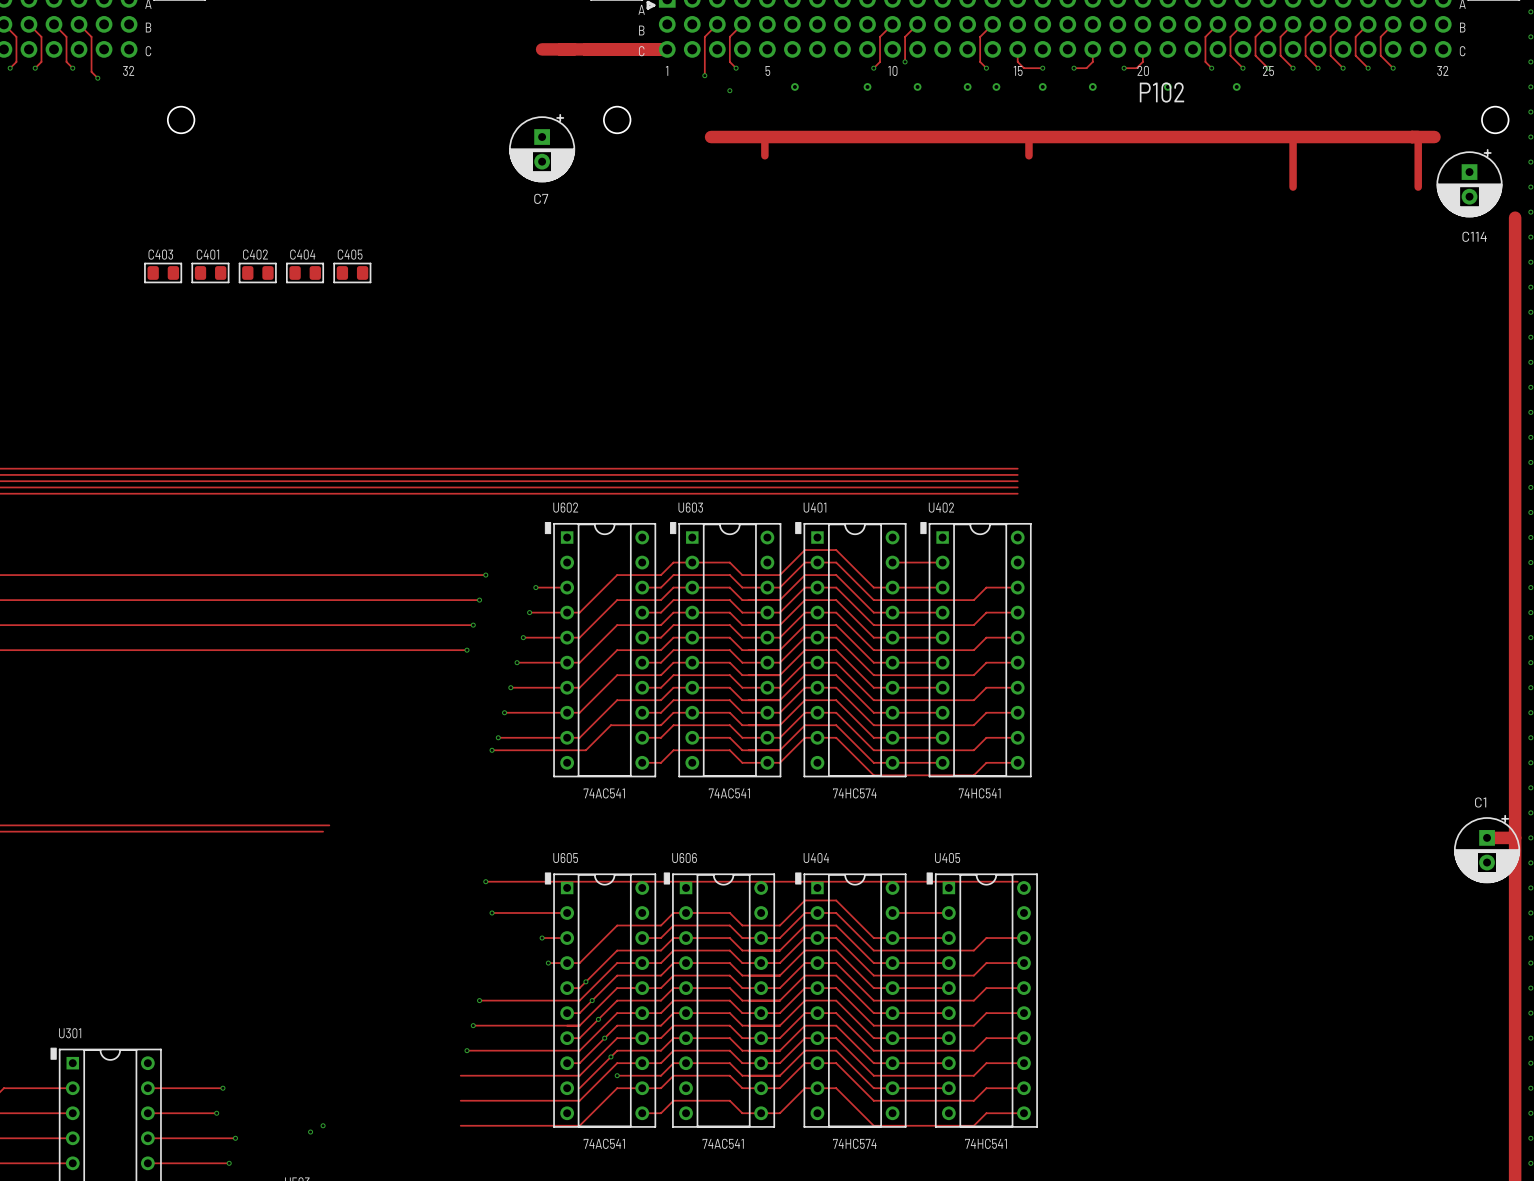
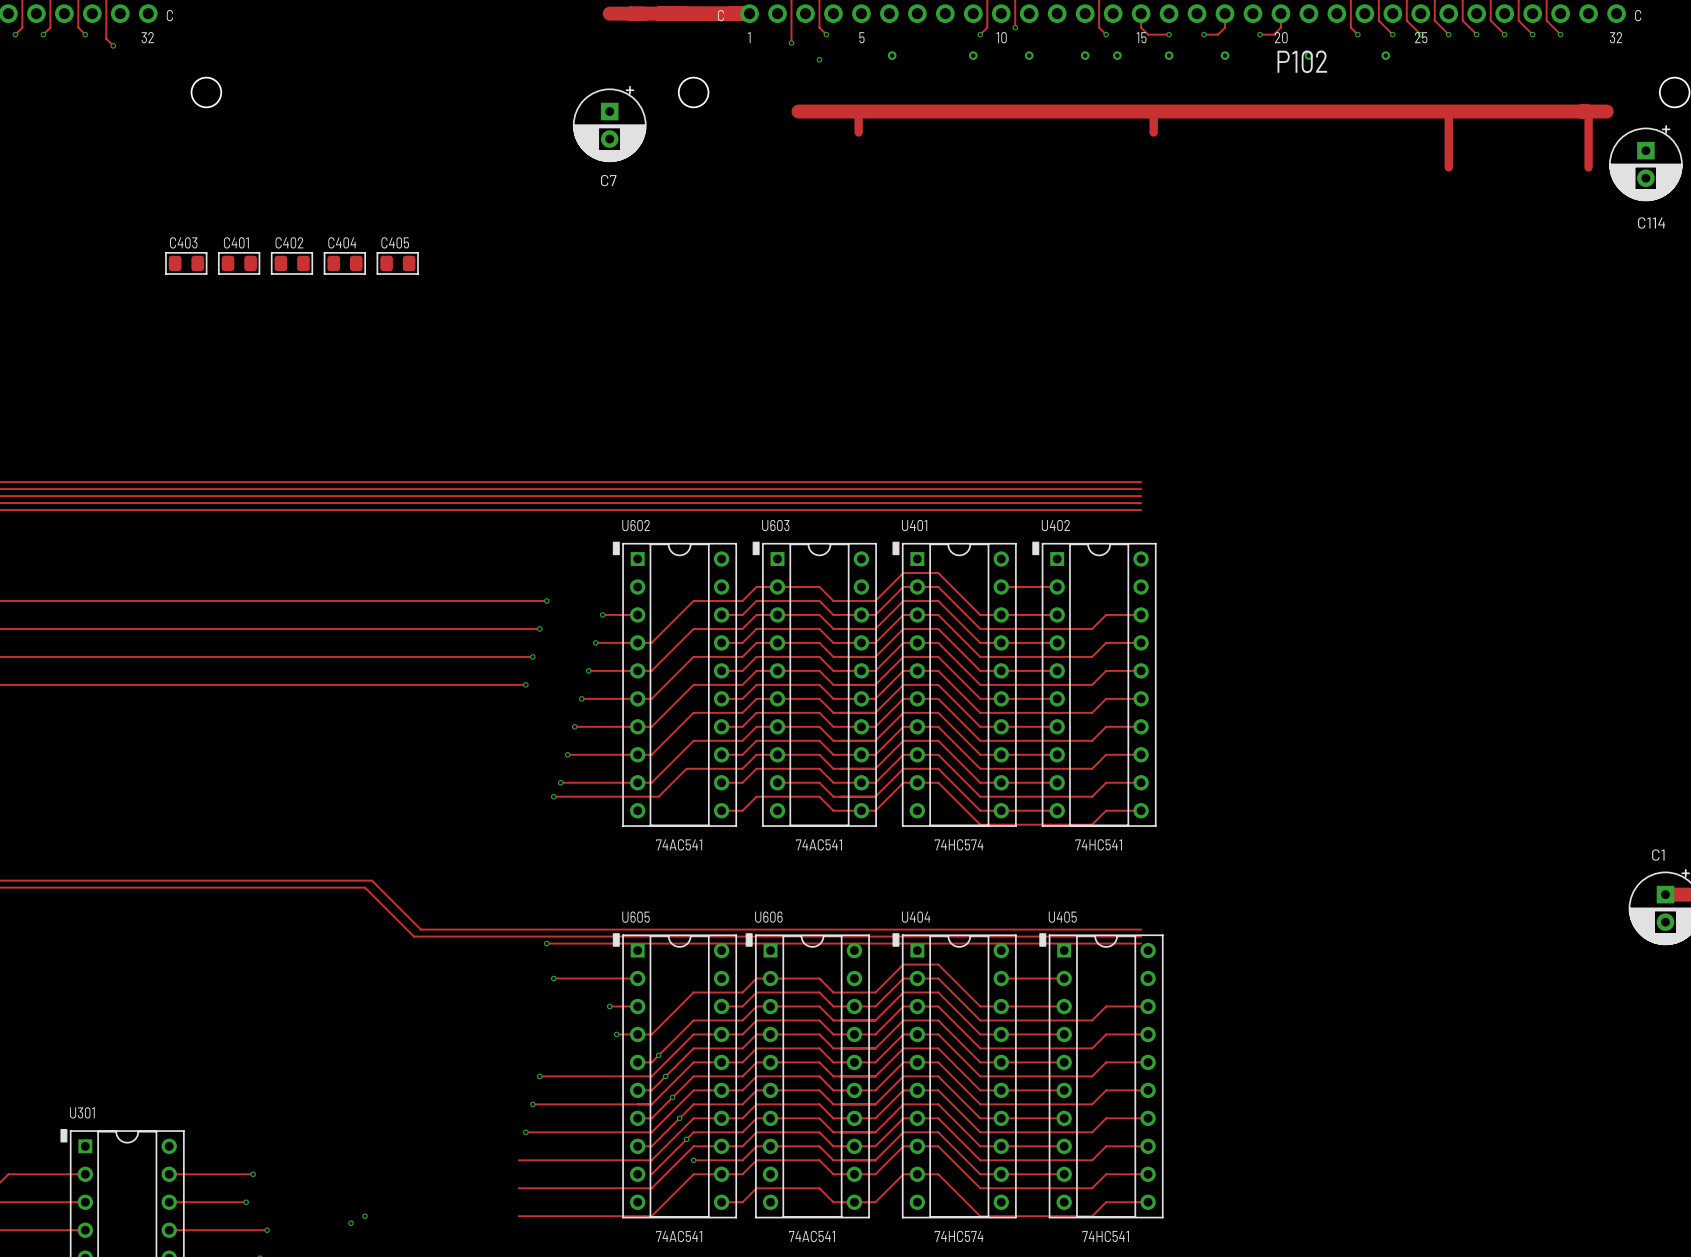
track: none -> (371, 880) (420, 929) (1141, 929)
track: none -> (365, 887) (413, 936) (1141, 936)

